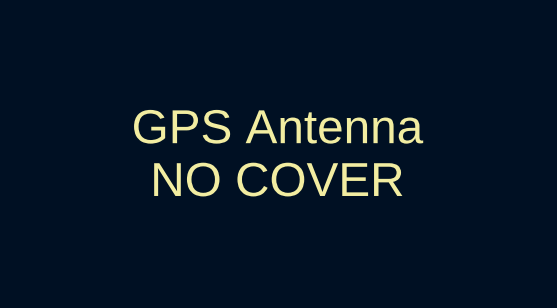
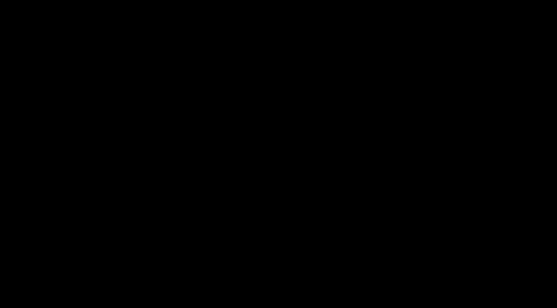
text: GPS Antenna (278, 126) -> none
text: NO COVER (278, 179) -> none

